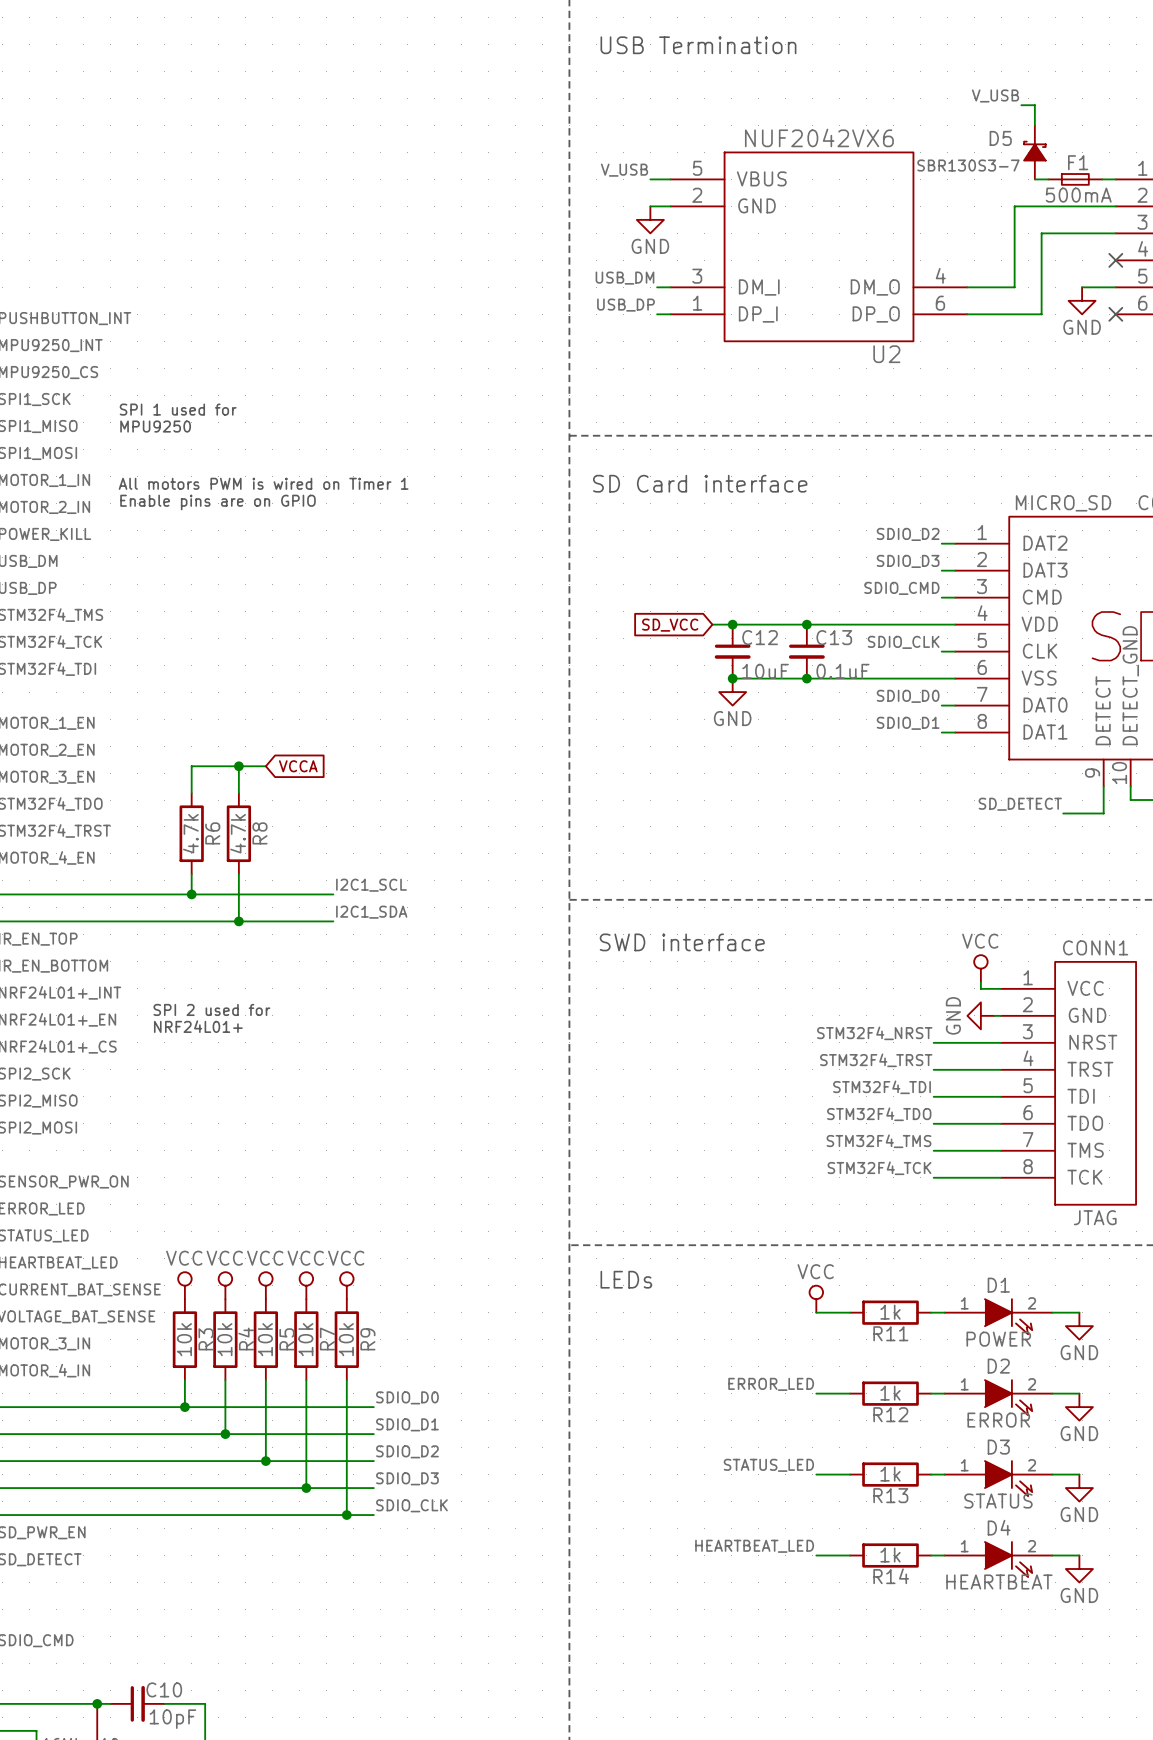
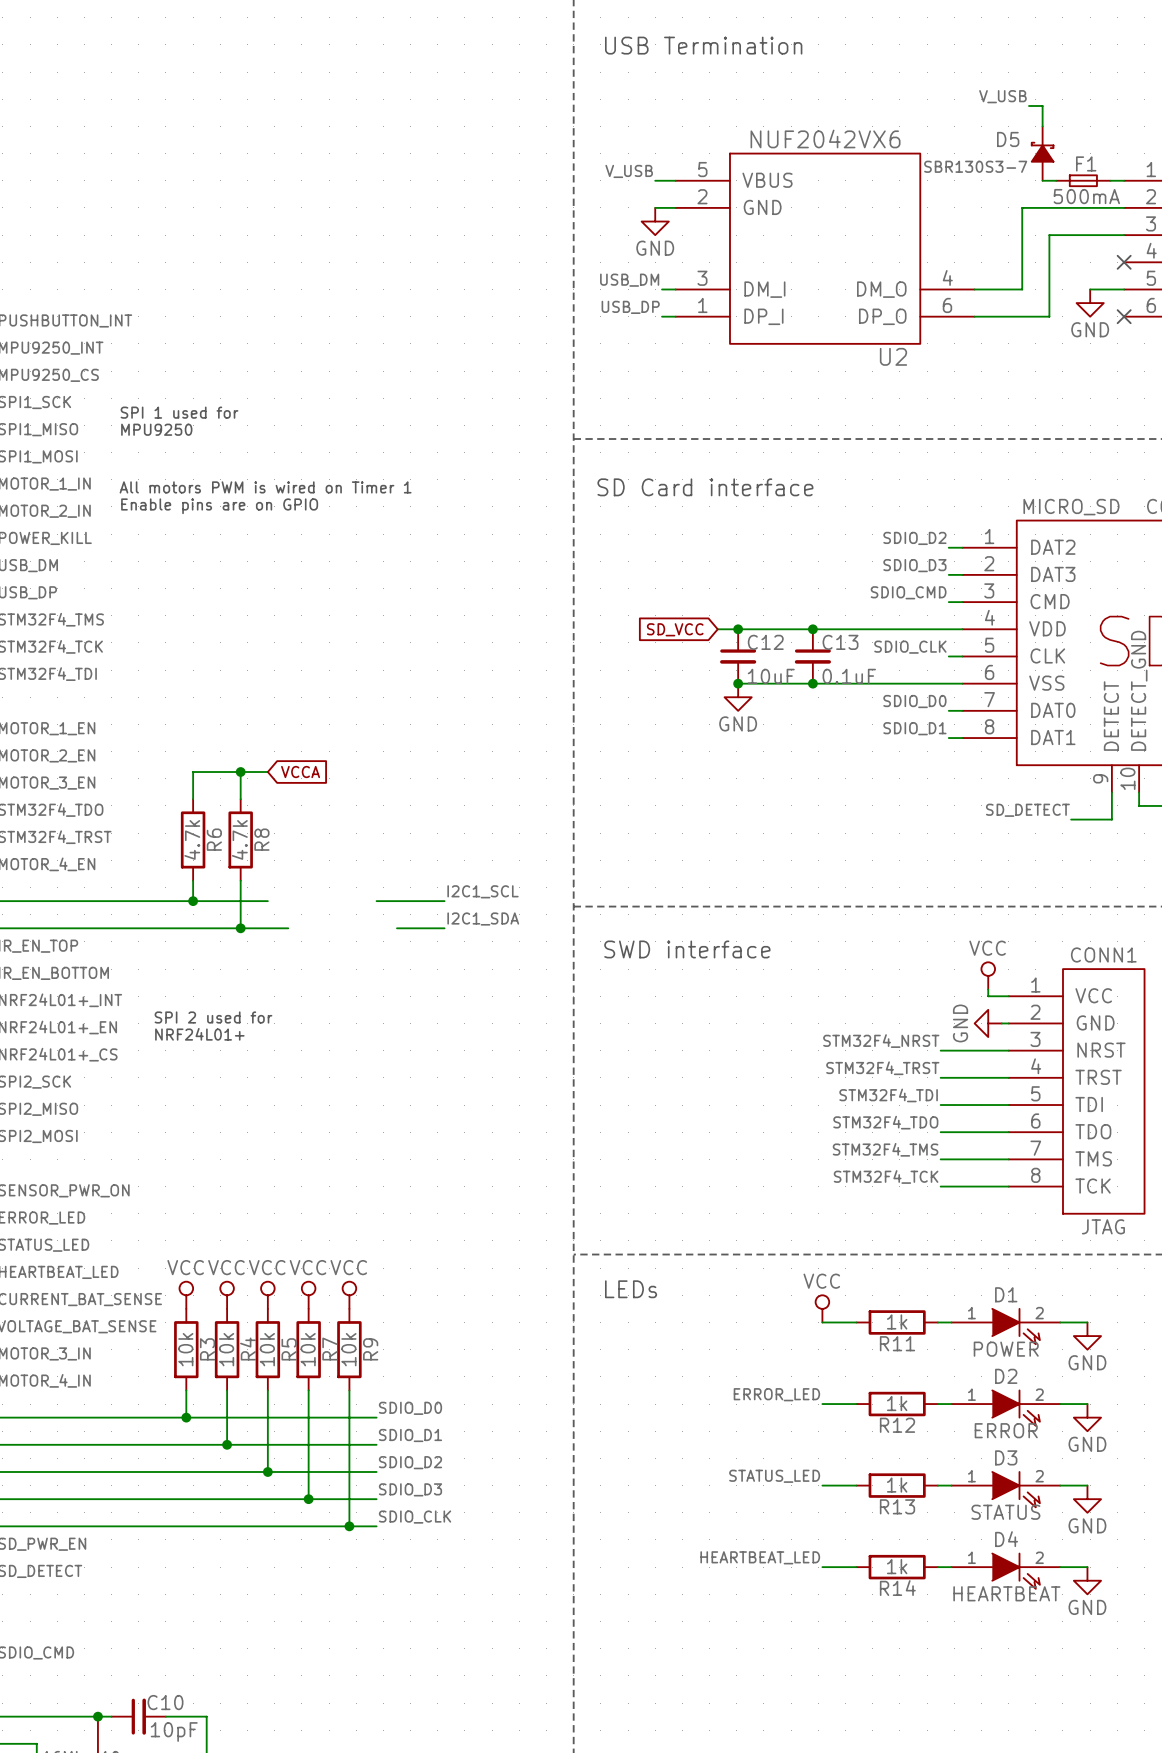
label position: I2C1_SCL (371, 885) -> I2C1_SCL (482, 891)
wire: (265, 894) (333, 894) -> (376, 901) (444, 901)
label position: I2C1_SDA (371, 912) -> I2C1_SDA (483, 919)
wire: (286, 921) (333, 921) -> (396, 928) (444, 928)

